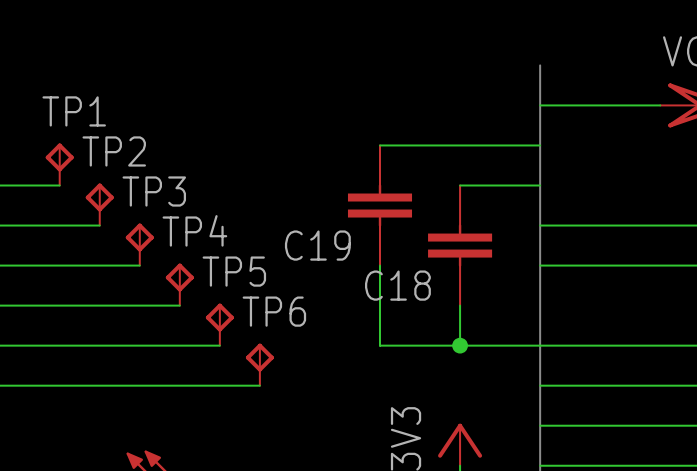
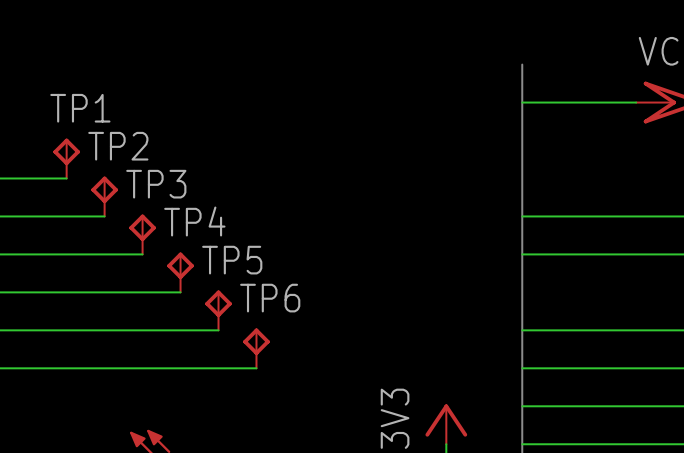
wire: (380, 145) (540, 145) -> none
wire: (460, 185) (540, 185) -> none
C19: (380, 205) -> none
C18: (460, 245) -> none
wire: (380, 265) (380, 345) (540, 345) -> none
wire: (460, 305) (460, 345) -> none
junction: (460, 345) -> none

